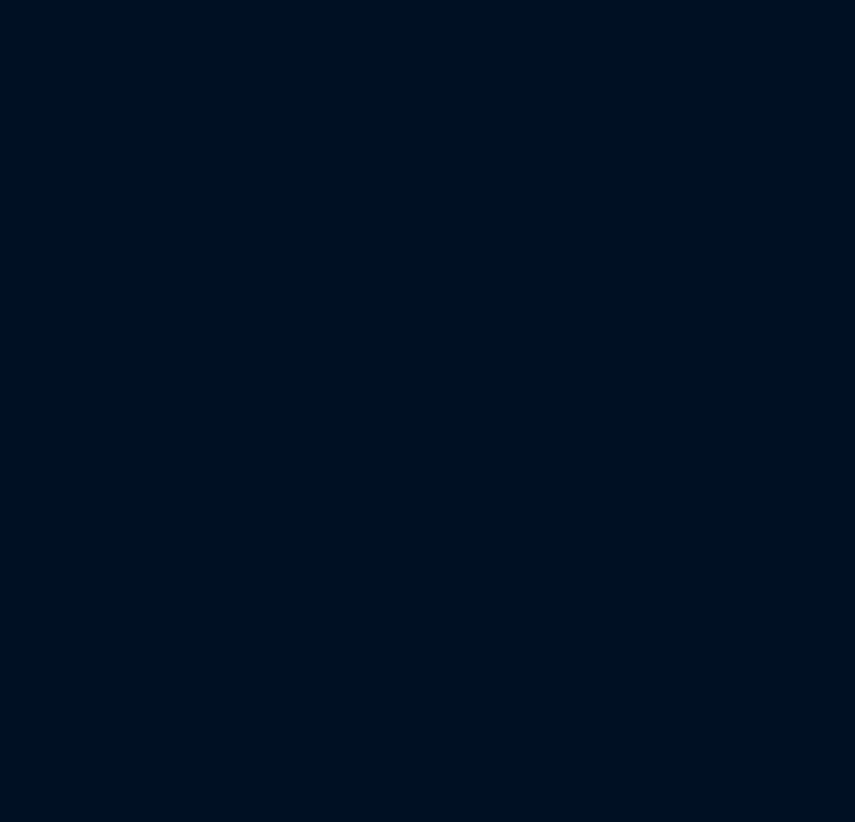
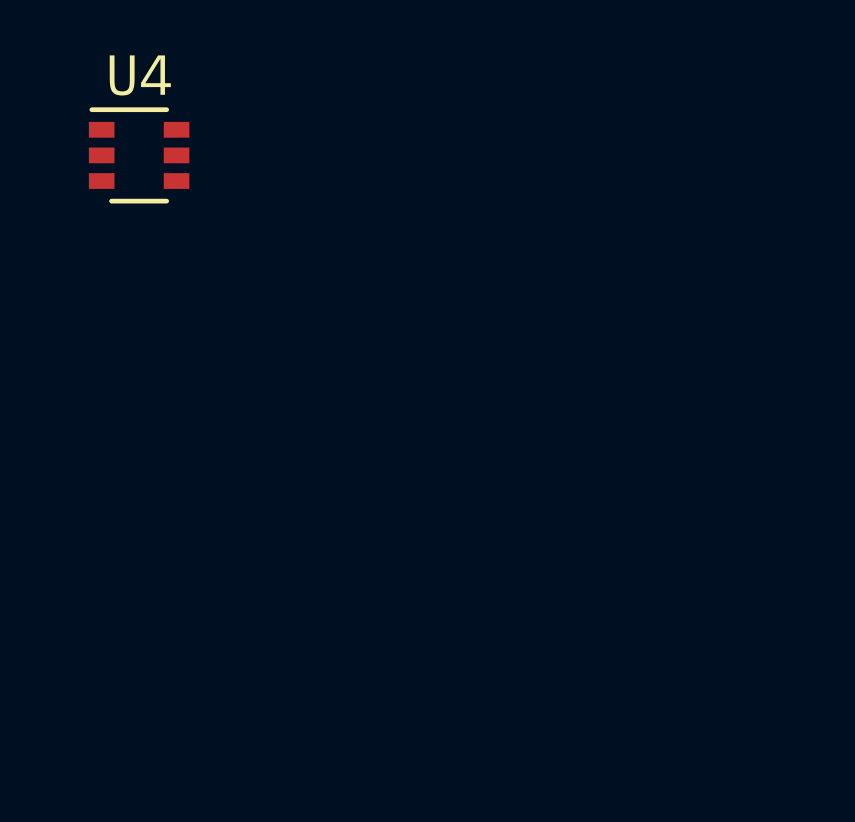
U4: none -> (139, 155)

